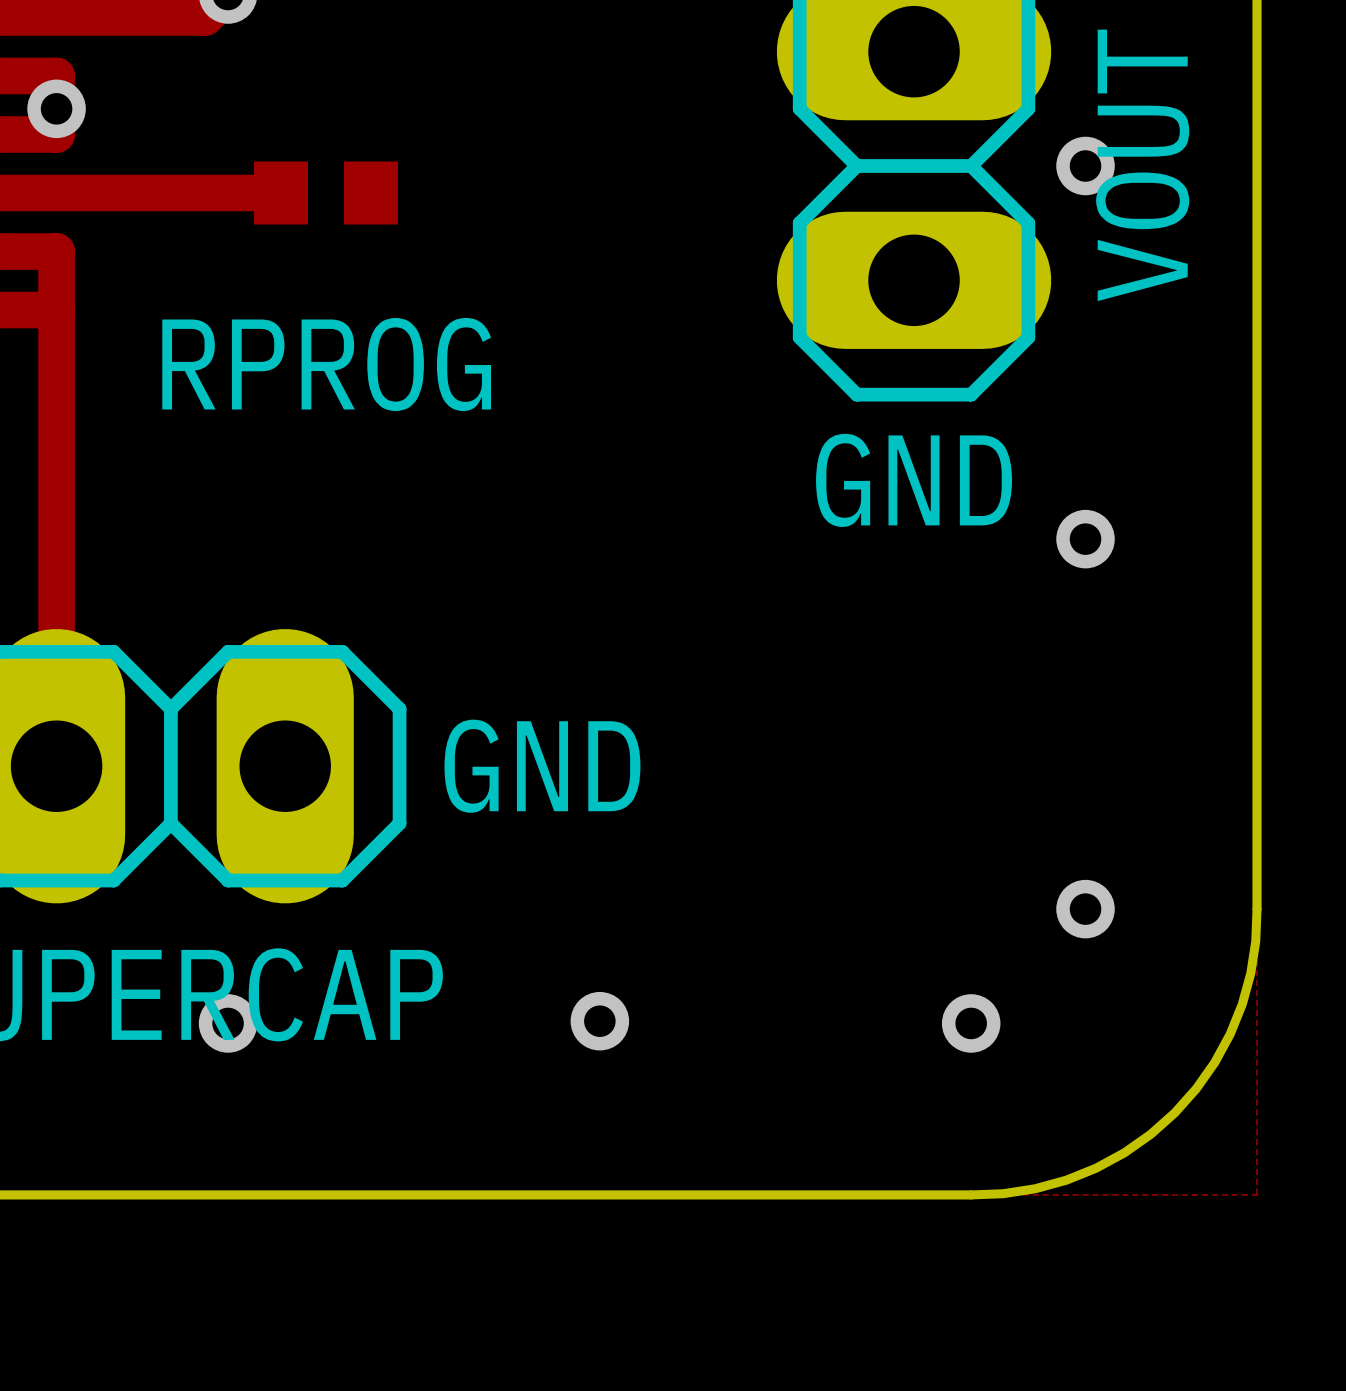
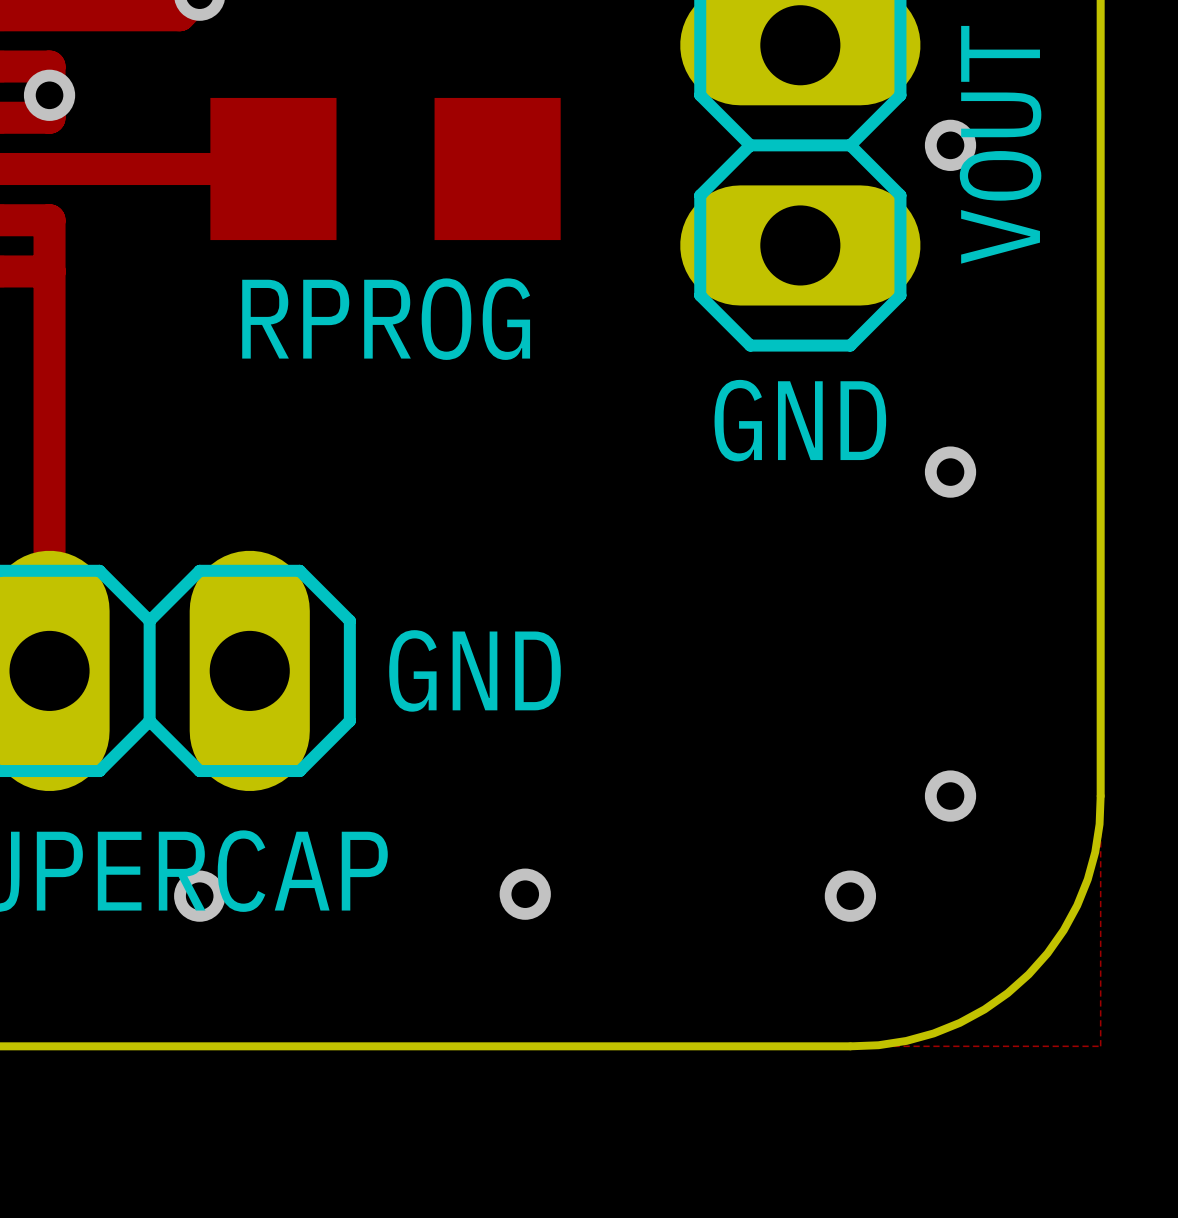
RPROG: (325, 193) -> none
RPROG: none -> (385, 169)

